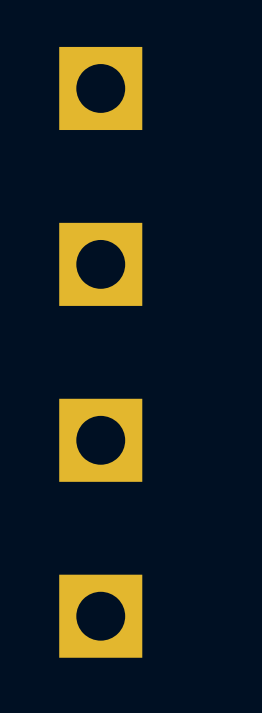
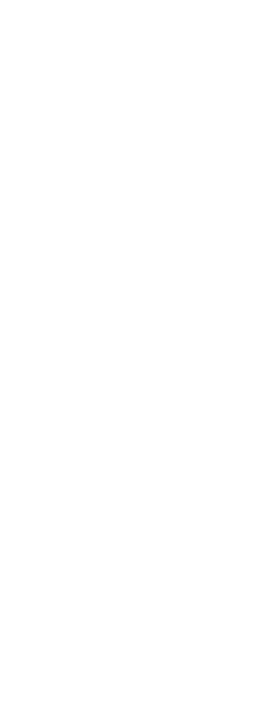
part: (100, 88) -> none
part: (100, 264) -> none
part: (100, 440) -> none
part: (100, 616) -> none

